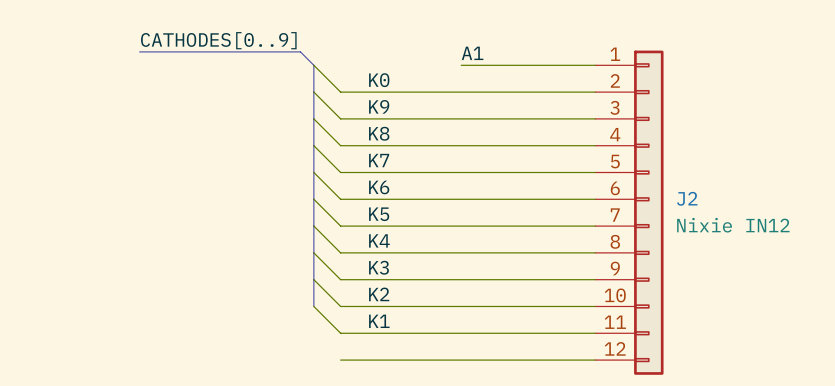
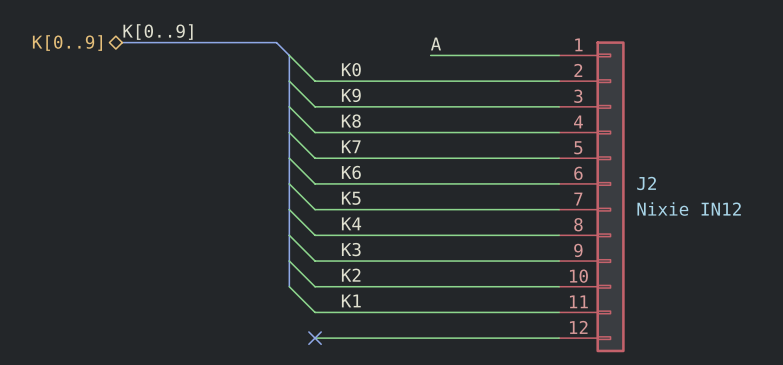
label: CATHODES[0..9] (218, 40) -> K[0..9] (158, 32)
hierarchical label: none -> K[0..9] (67, 43)
label: A1 (472, 53) -> A (435, 43)
no-connect mark: none -> (315, 338)

